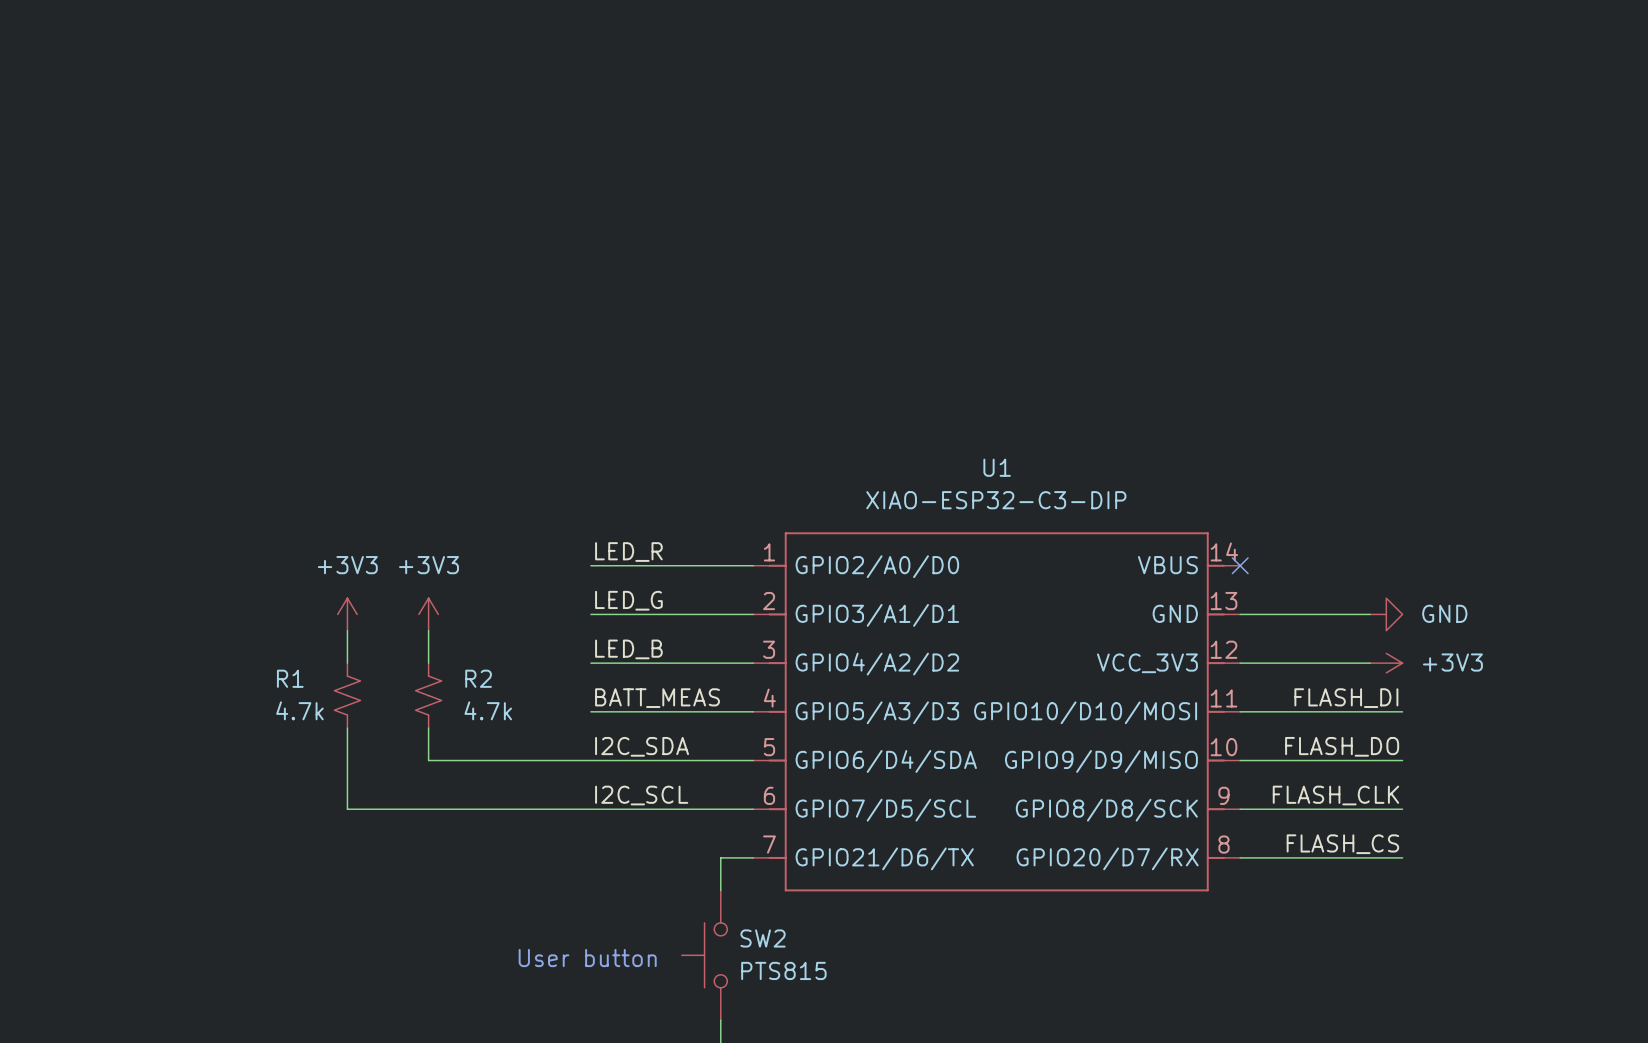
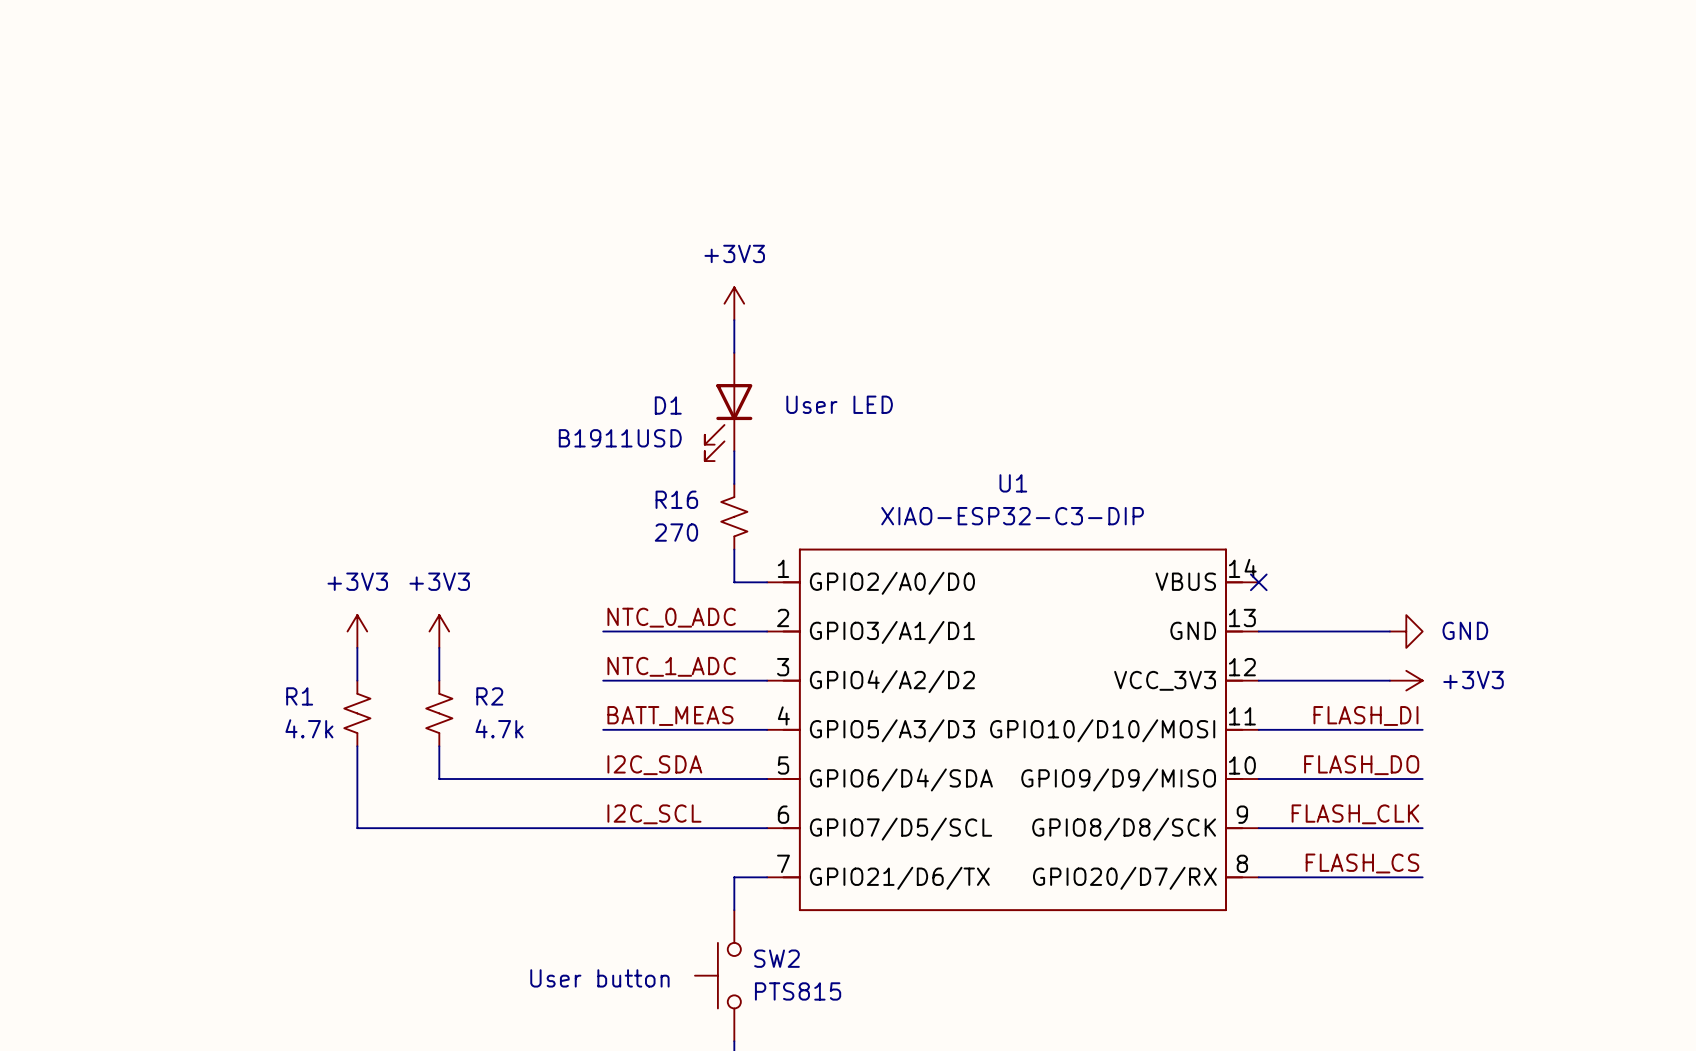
power symbol: none -> +3V3 (734, 303)
wire: none -> (734, 320) (734, 352)
text: none -> User LED (839, 404)
D1: none -> B1911USD (728, 406)
wire: none -> (734, 451) (734, 483)
R16: none -> 270 (734, 516)
label: LED_R (628, 552) -> none
wire: (590, 565) (720, 565) -> (734, 549) (734, 582)
label: LED_G (628, 600) -> NTC_0_ADC (671, 617)
label: LED_B (628, 649) -> NTC_1_ADC (671, 666)

